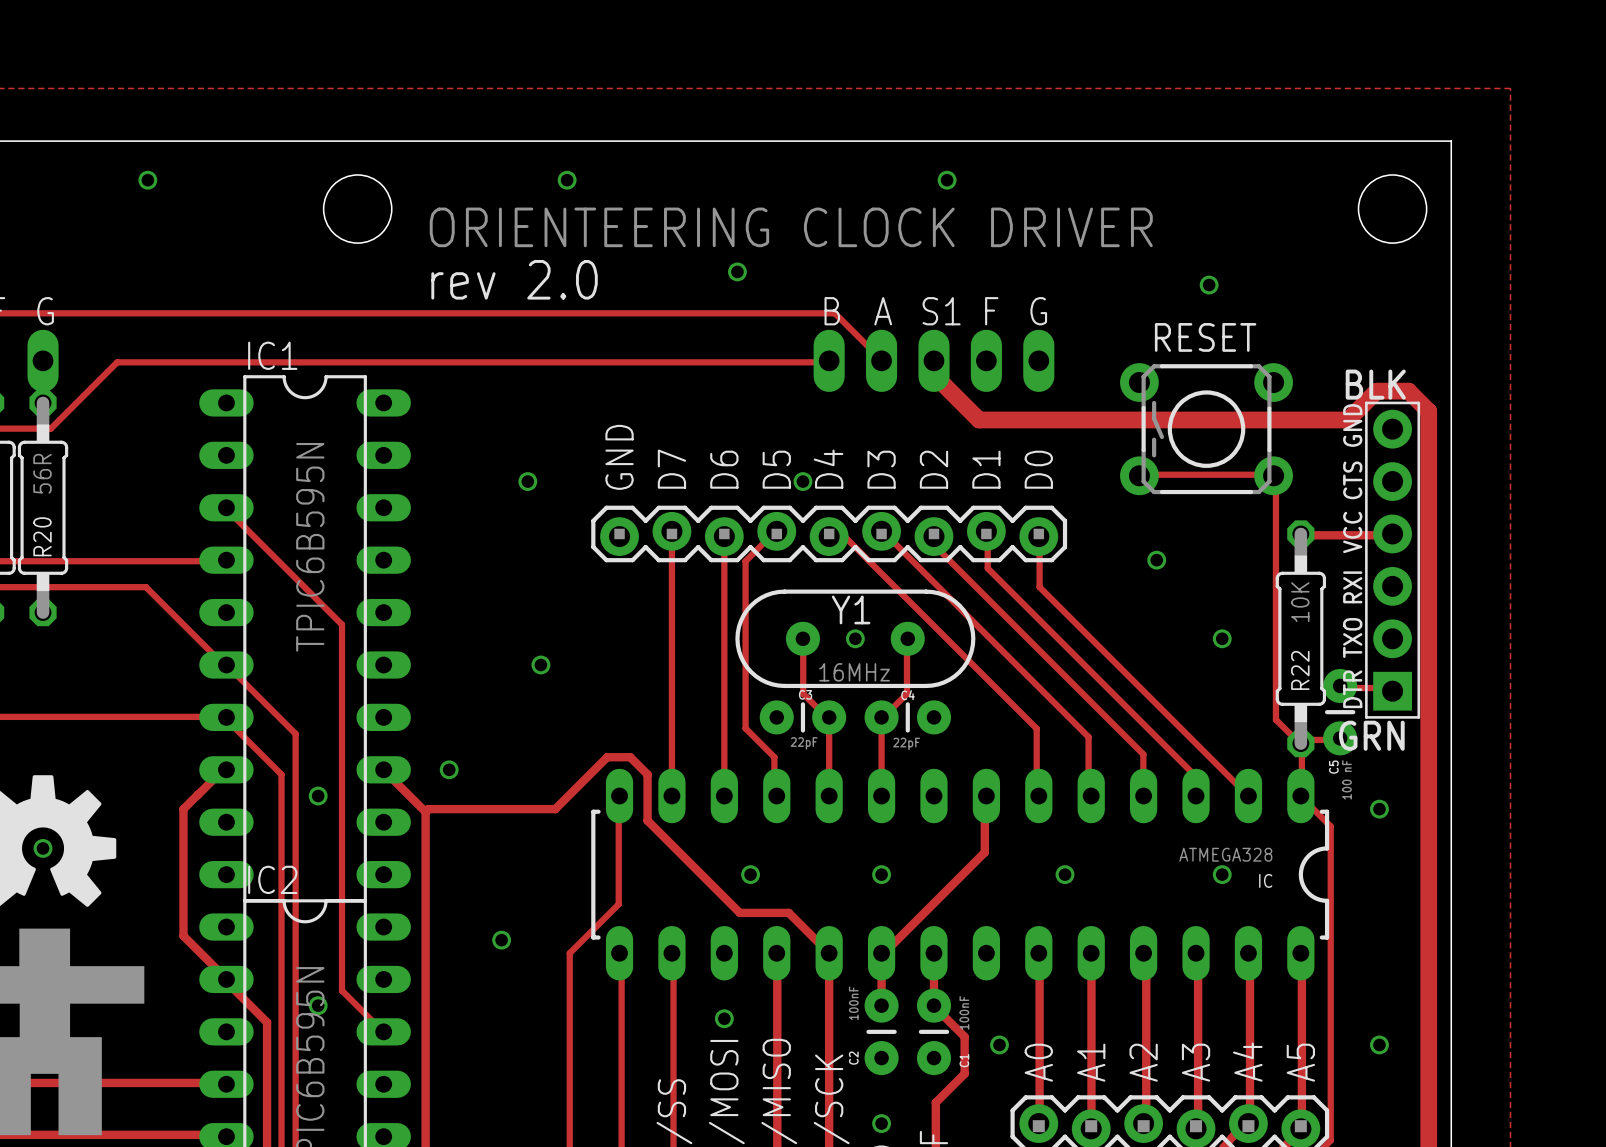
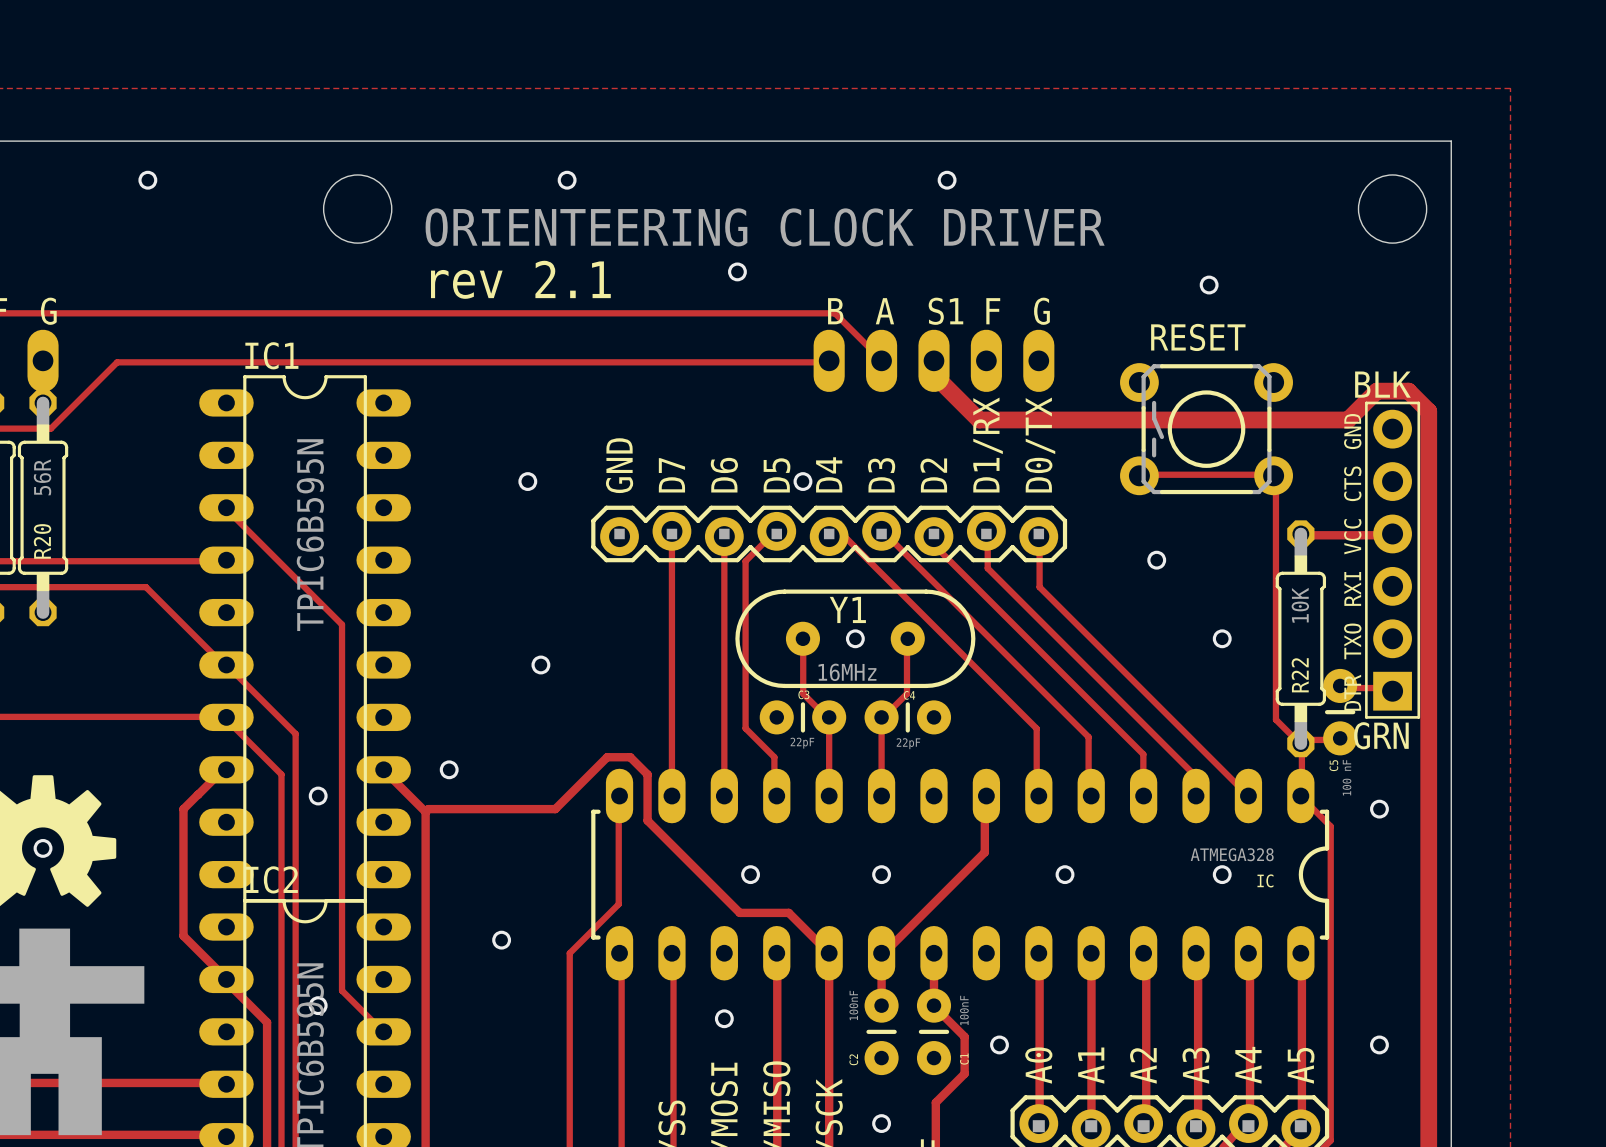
text: rev 2.0 (514, 279) -> rev 2.1 (520, 279)
text: D1 (986, 469) -> D1/RX (988, 445)
text: D0 (1038, 469) -> D0/TX (1040, 445)

